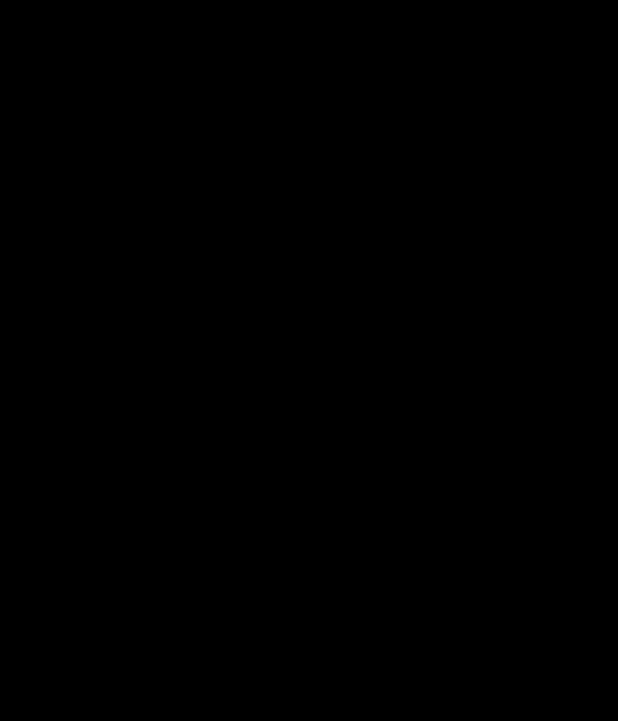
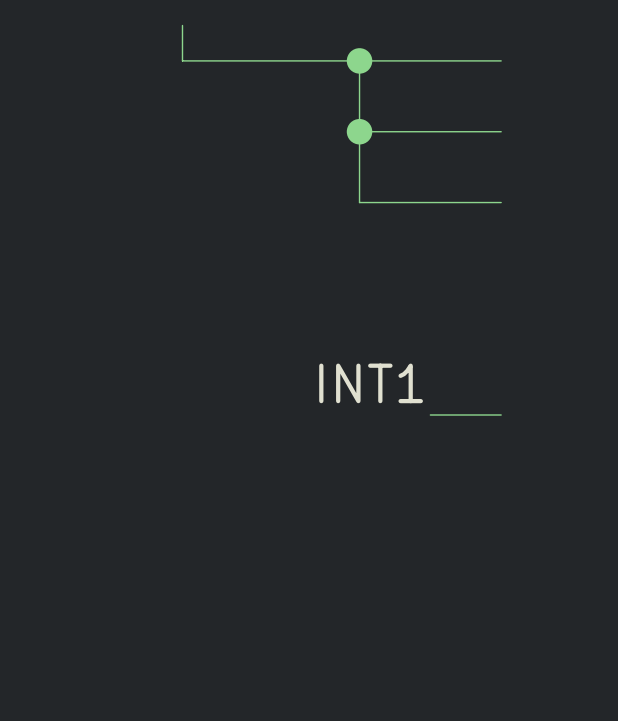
wire: none -> (182, 25) (182, 60) (501, 60)
wire: none -> (359, 60) (359, 202) (501, 202)
junction: none -> (359, 60)
wire: none -> (359, 131) (501, 131)
junction: none -> (359, 131)
label: none -> INT1 (371, 383)
wire: none -> (430, 415) (501, 415)

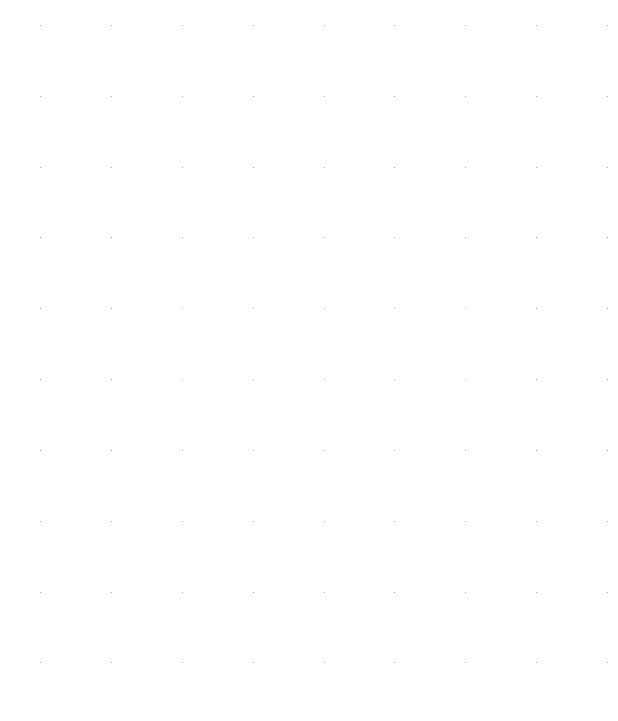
wire: (182, 25) (182, 60) (501, 60) -> none
wire: (359, 60) (359, 202) (501, 202) -> none
junction: (359, 60) -> none
wire: (359, 131) (501, 131) -> none
junction: (359, 131) -> none
label: INT1 (371, 383) -> none
wire: (430, 415) (501, 415) -> none

